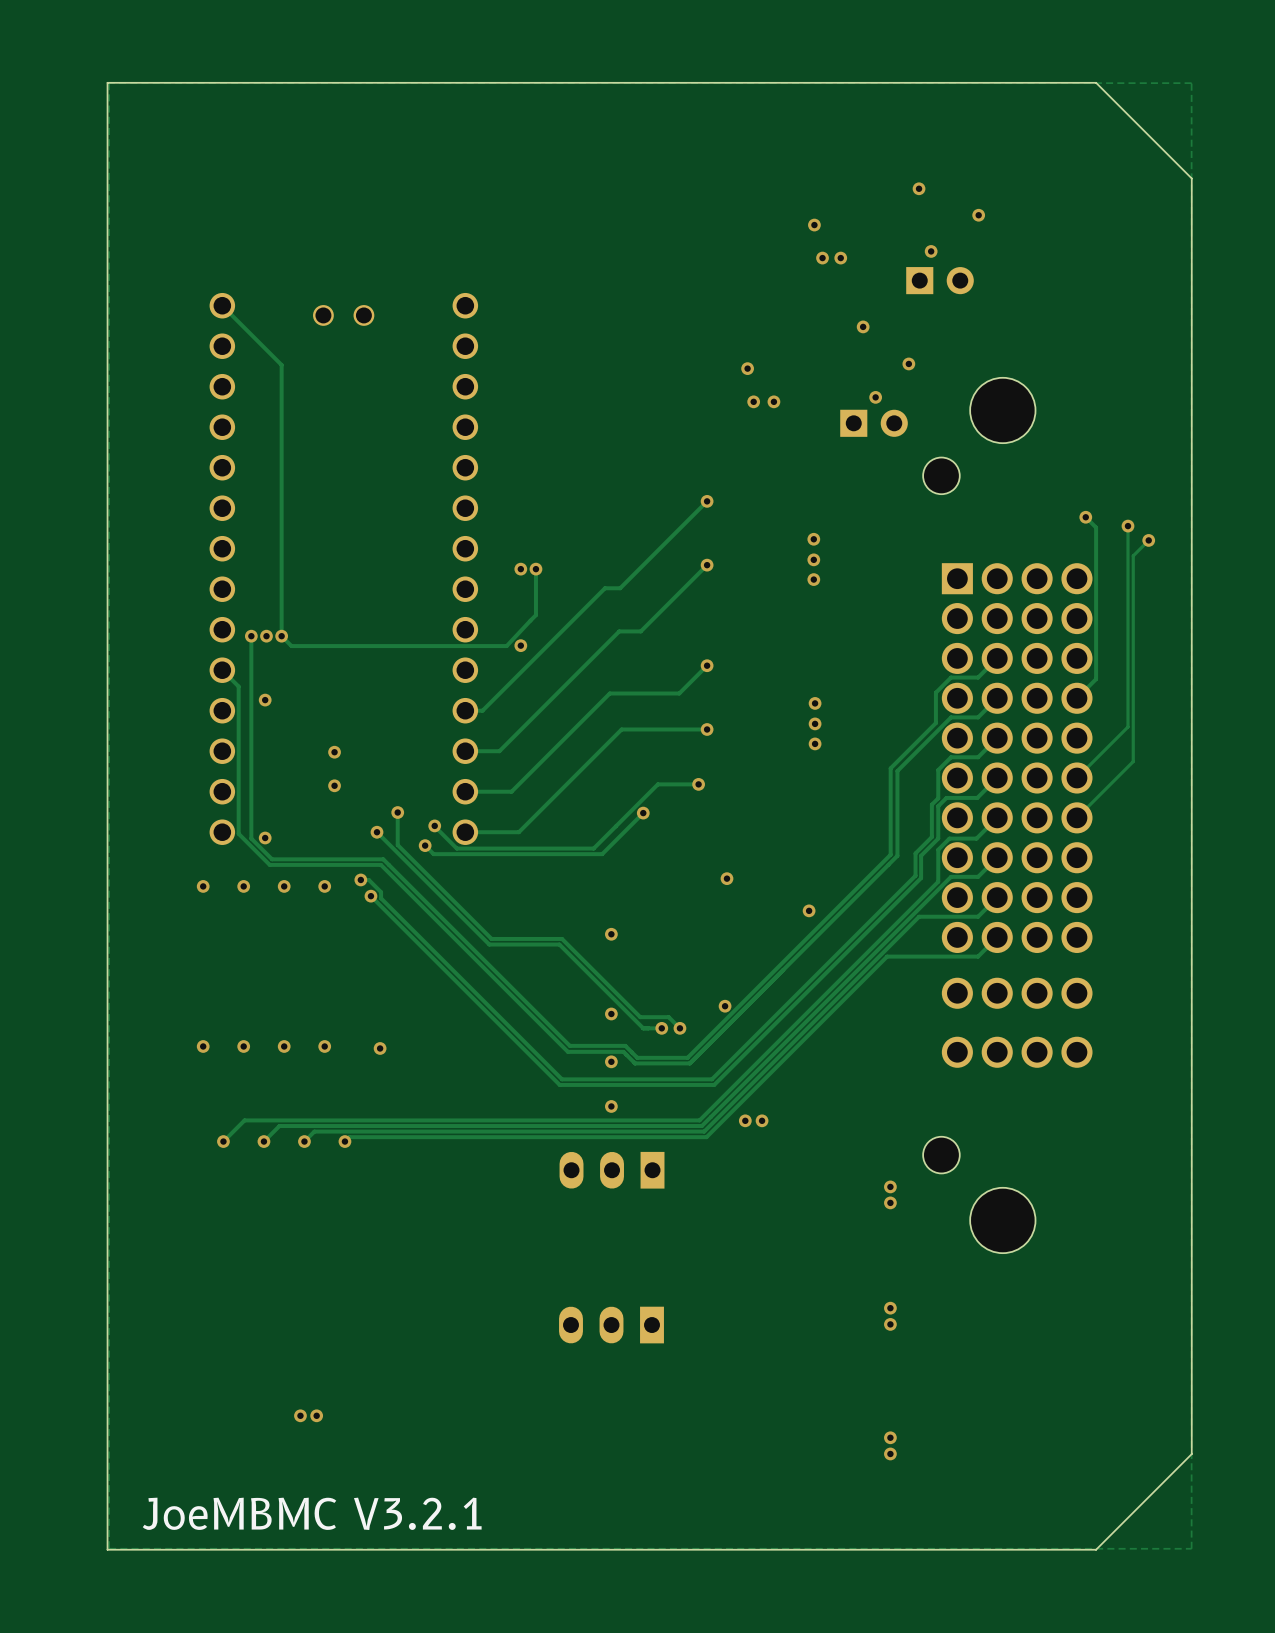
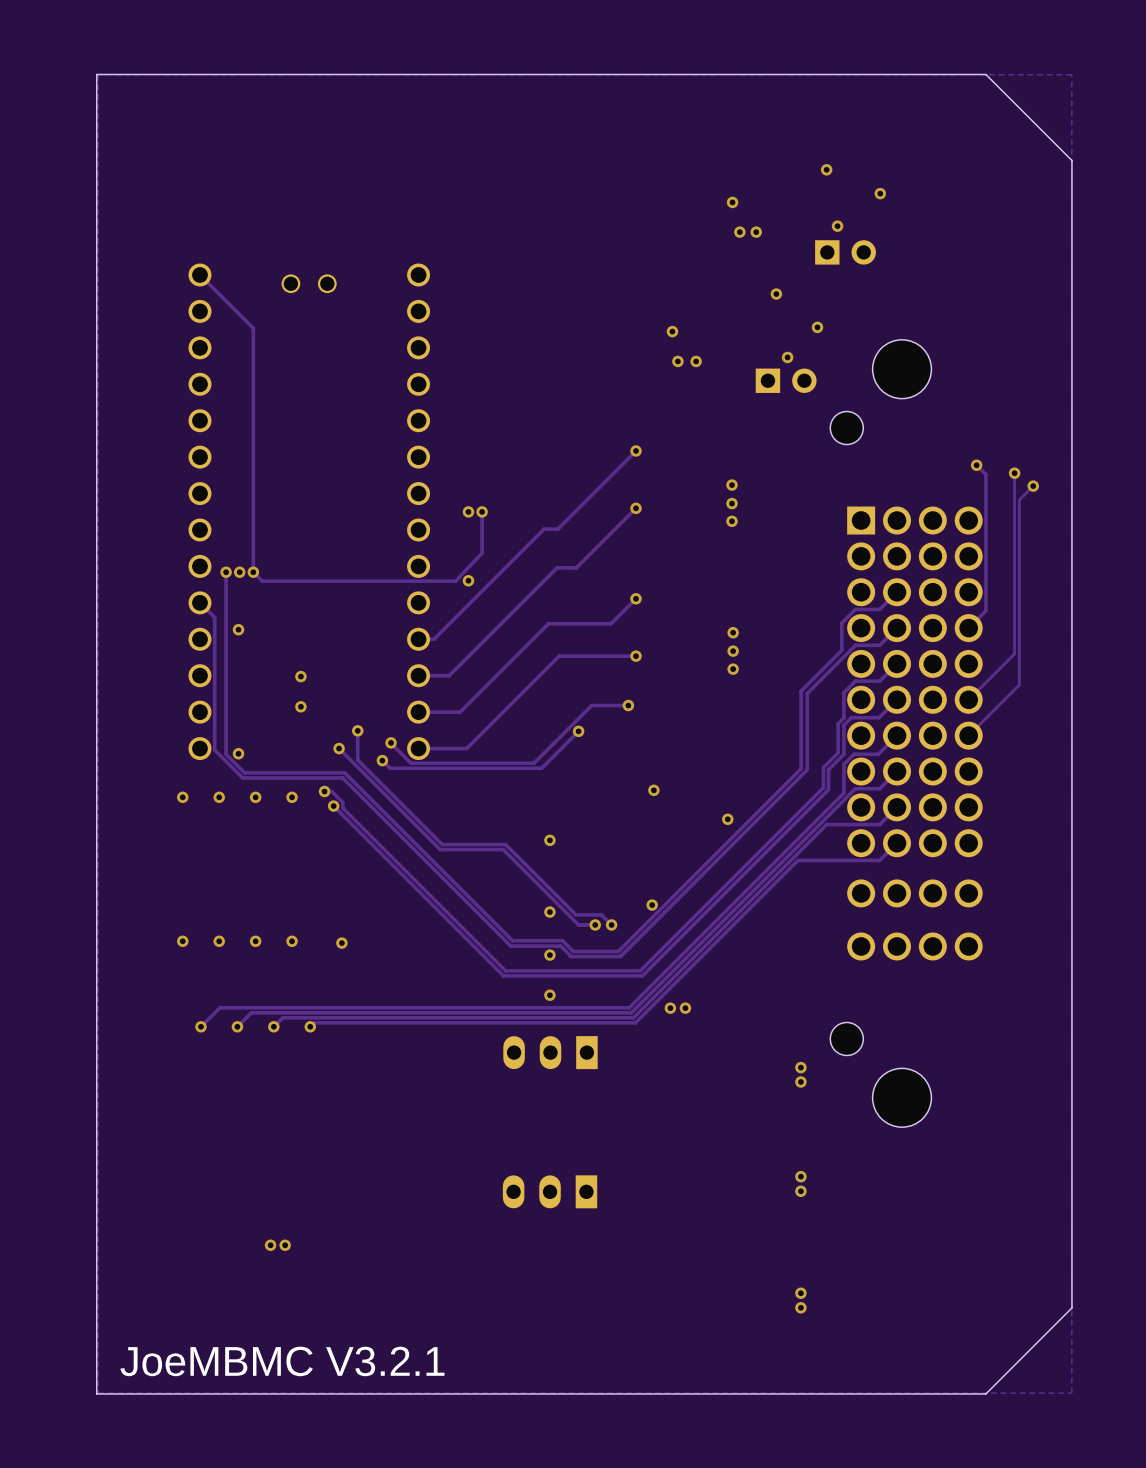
via: none -> (270, 1245)
via: none -> (285, 1245)
via: (300, 1415) -> none
via: (316, 1415) -> none

